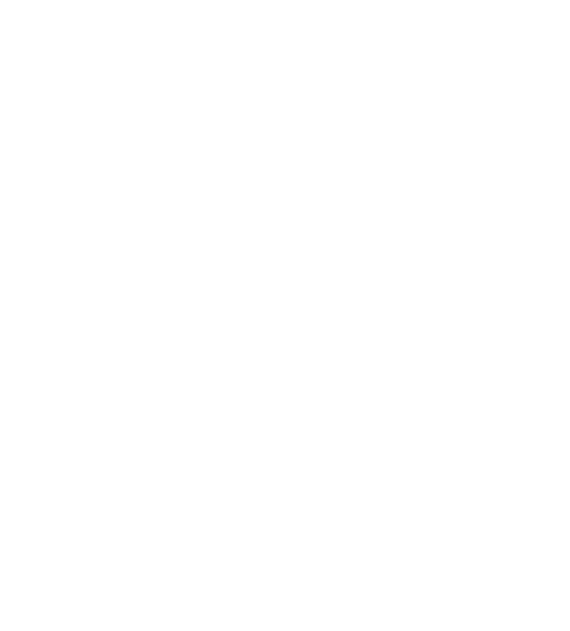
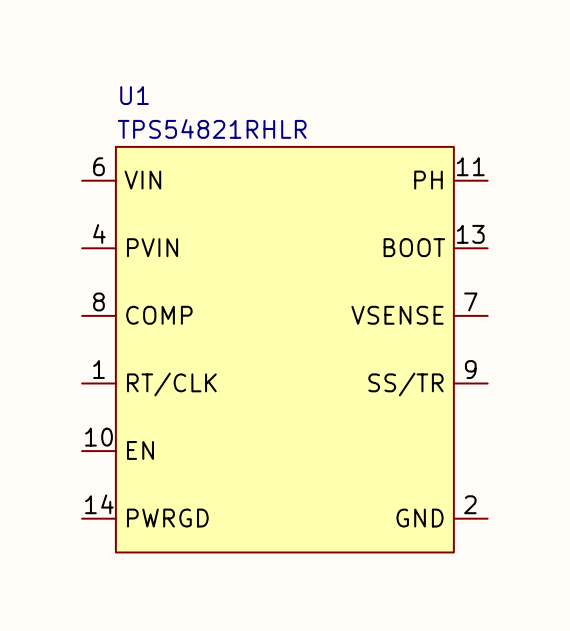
U1: none -> TPS54821RHLR (284, 349)

